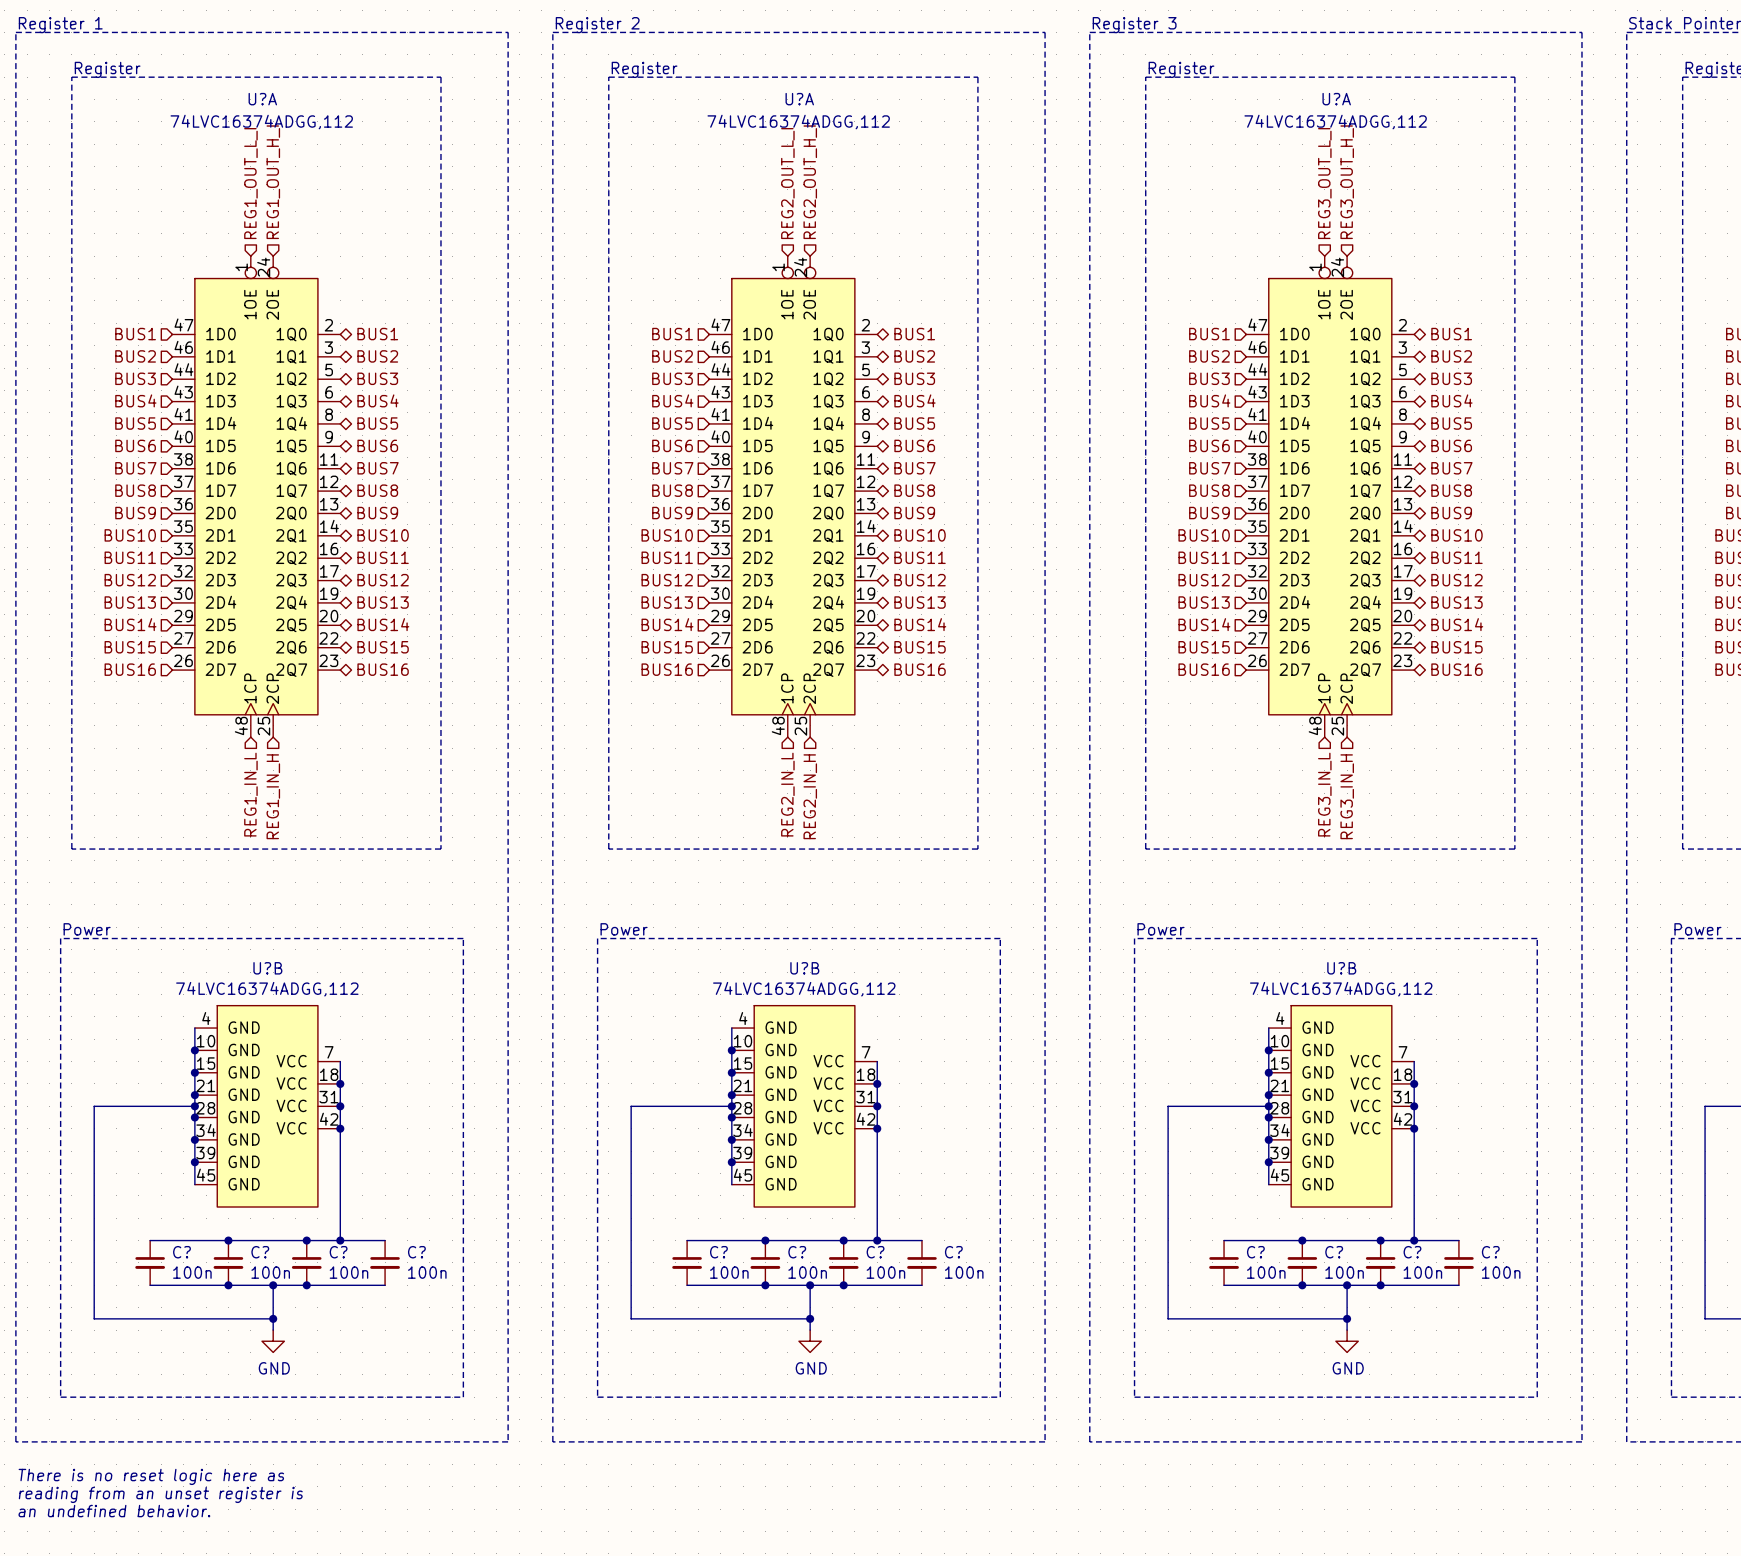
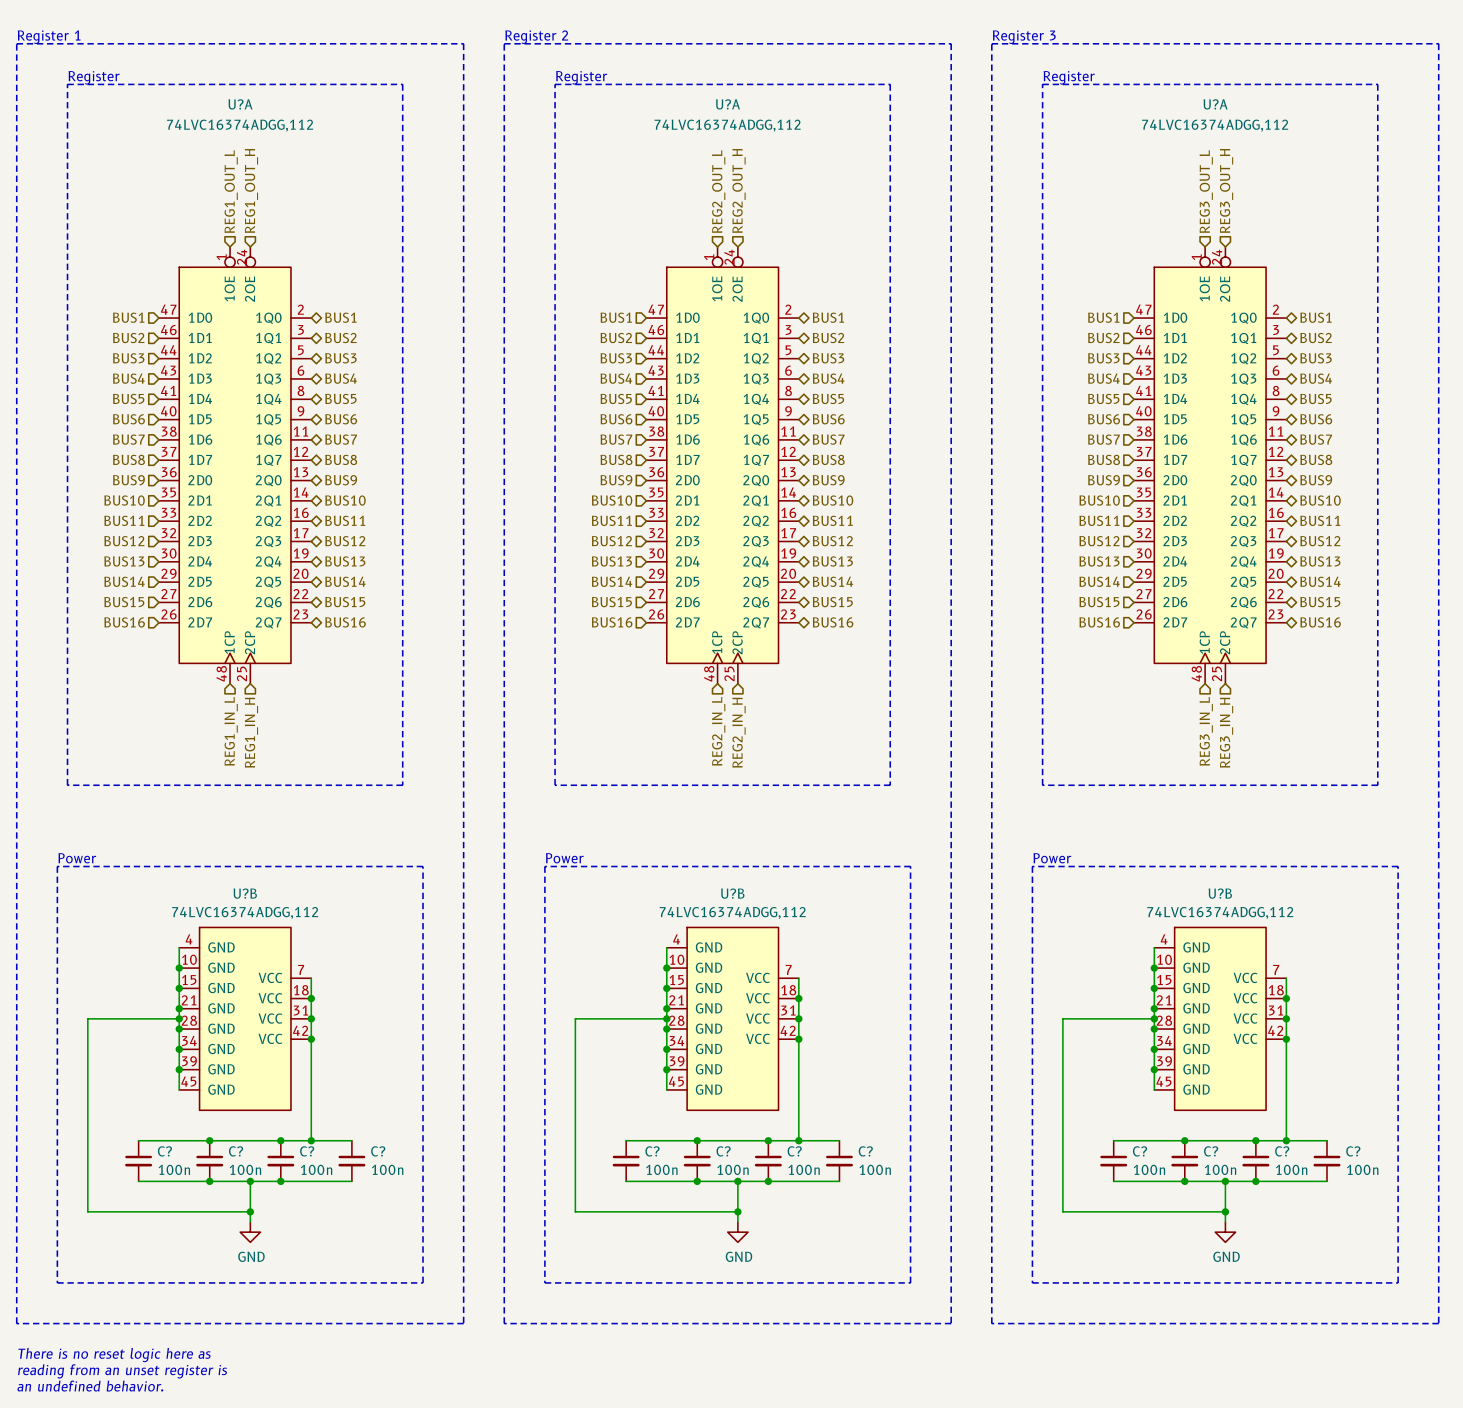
hierarchical label: REG1_OUT_H_I (273, 182) -> REG1_OUT_H (251, 191)
hierarchical label: REG2_OUT_H_I (810, 182) -> REG2_OUT_H (739, 191)
hierarchical label: REG3_OUT_H_I (1347, 182) -> REG3_OUT_H (1226, 191)
hierarchical label: REG1_OUT_L_I (250, 183) -> REG1_OUT_L (231, 191)
hierarchical label: REG2_OUT_L_I (787, 183) -> REG2_OUT_L (718, 191)
hierarchical label: REG3_OUT_L_I (1324, 183) -> REG3_OUT_L (1206, 191)

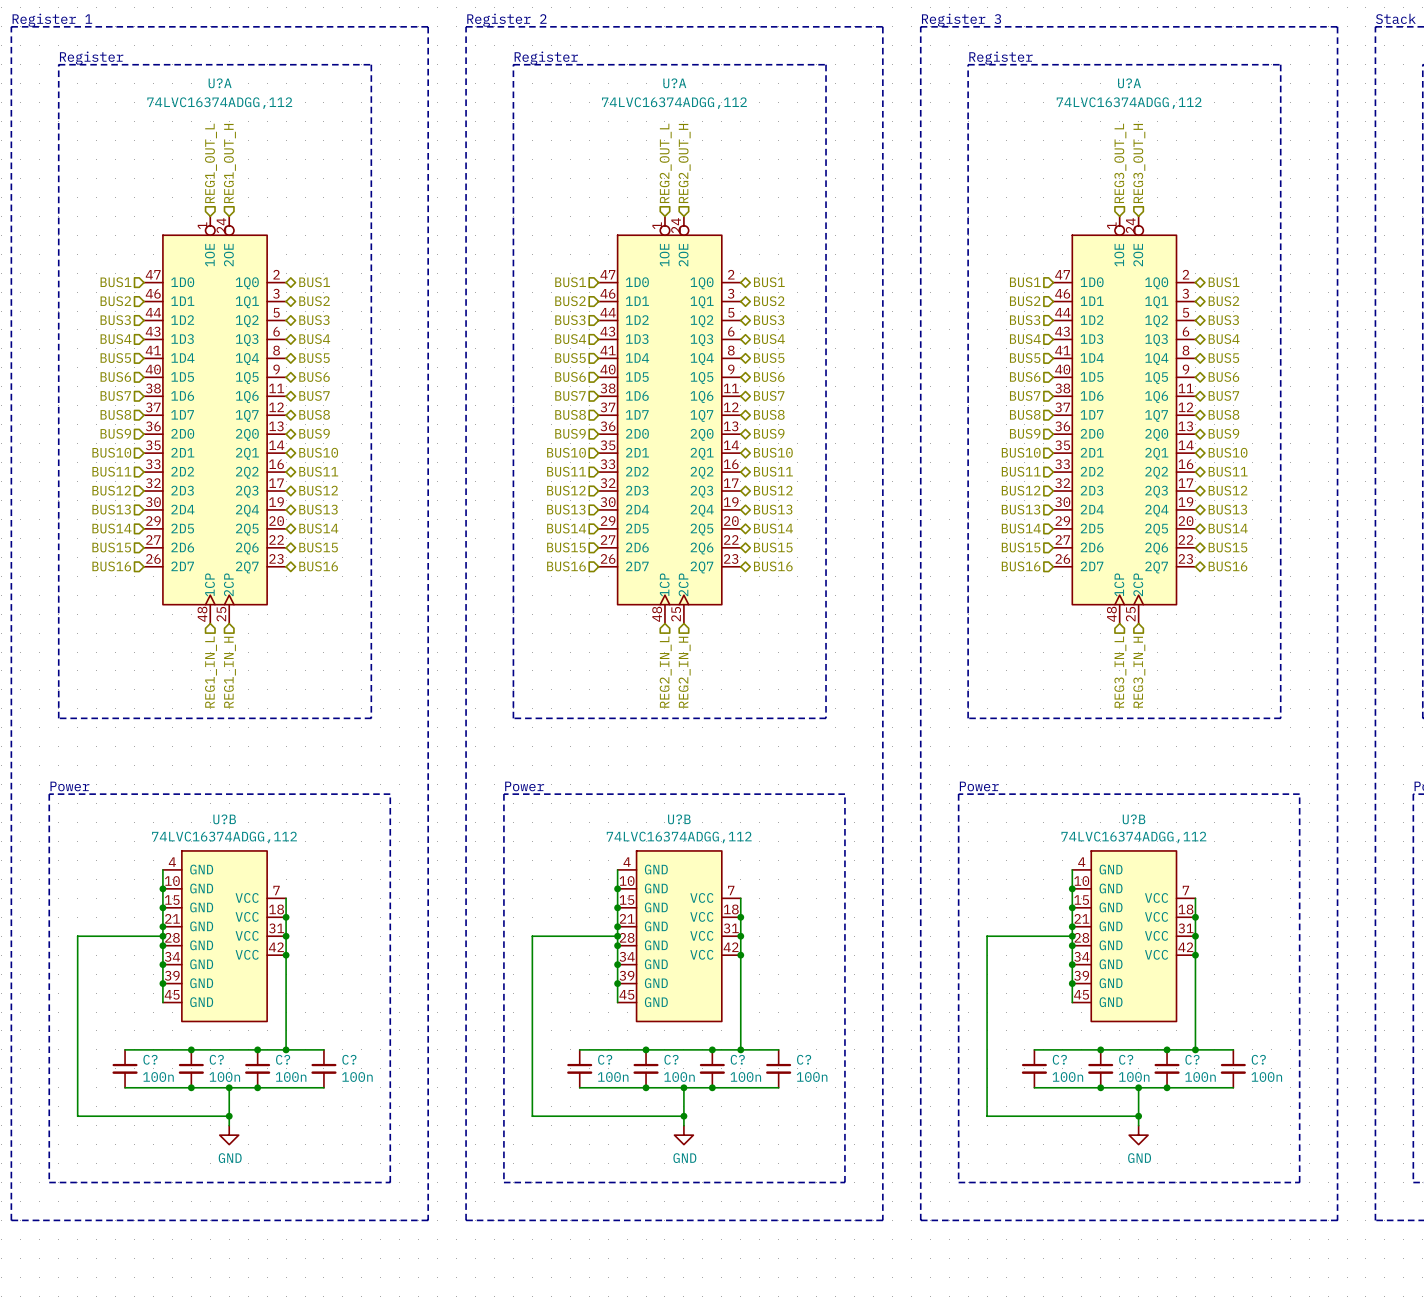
text: There is no reset logic here as (114, 1355) -> none
text: reading from an unset register is (122, 1371) -> none
text: an undefined behavior. (90, 1386) -> none

